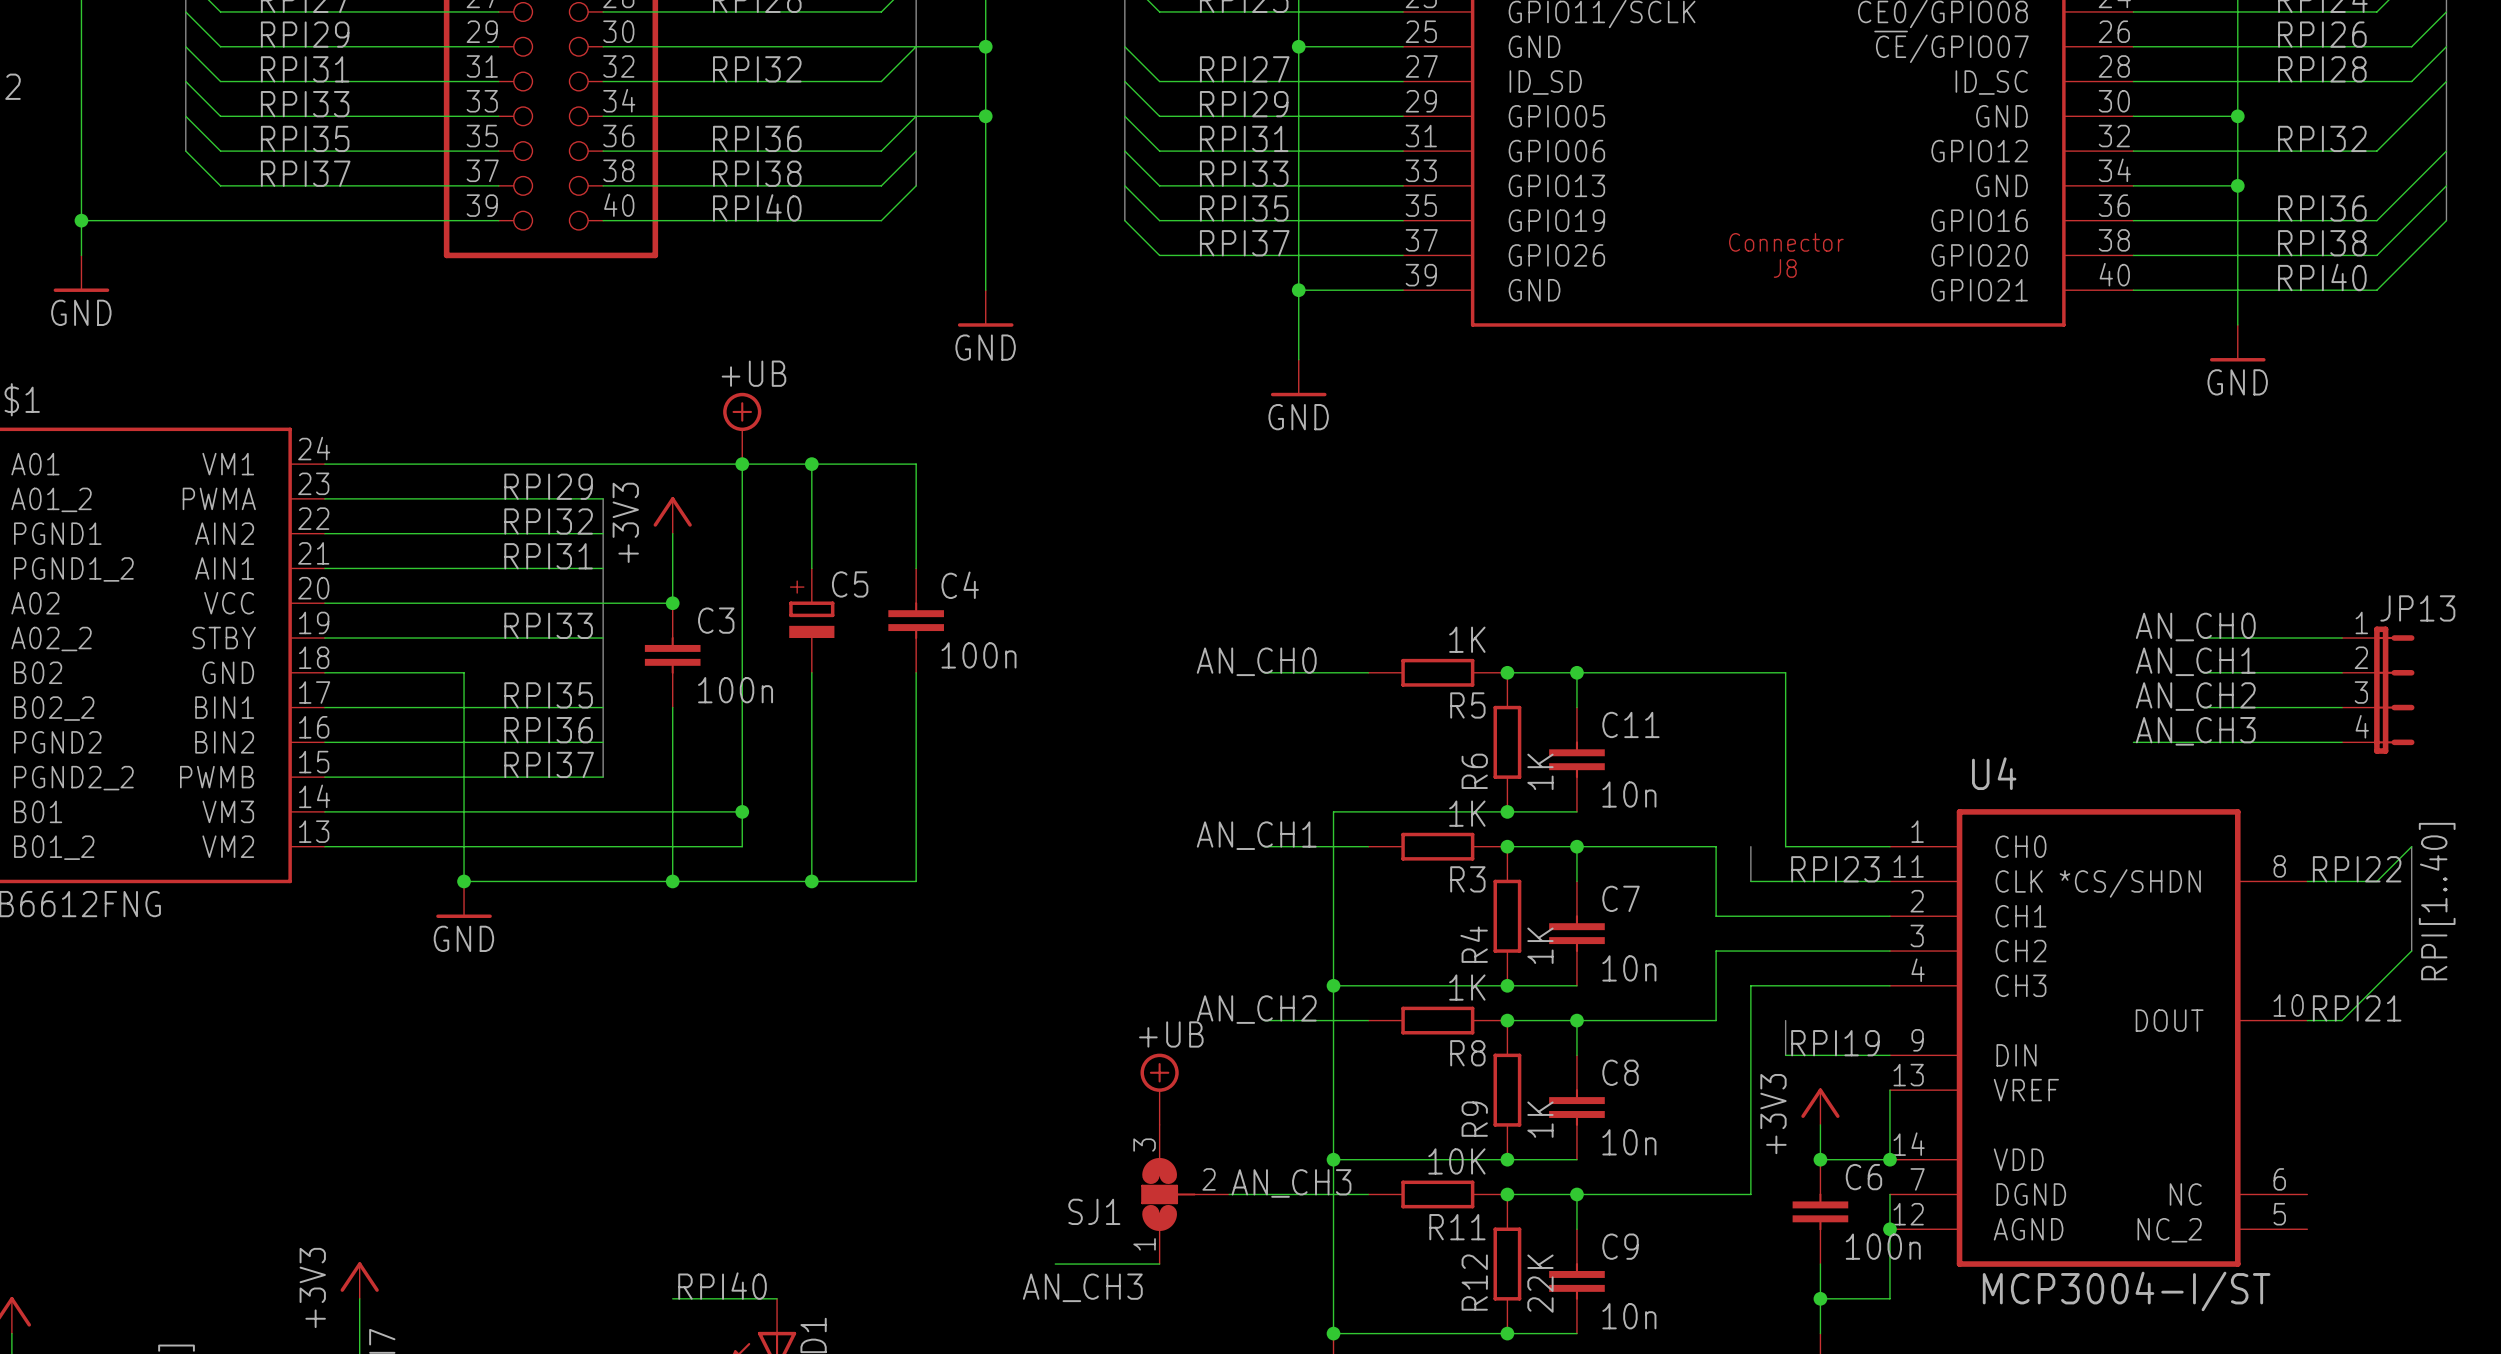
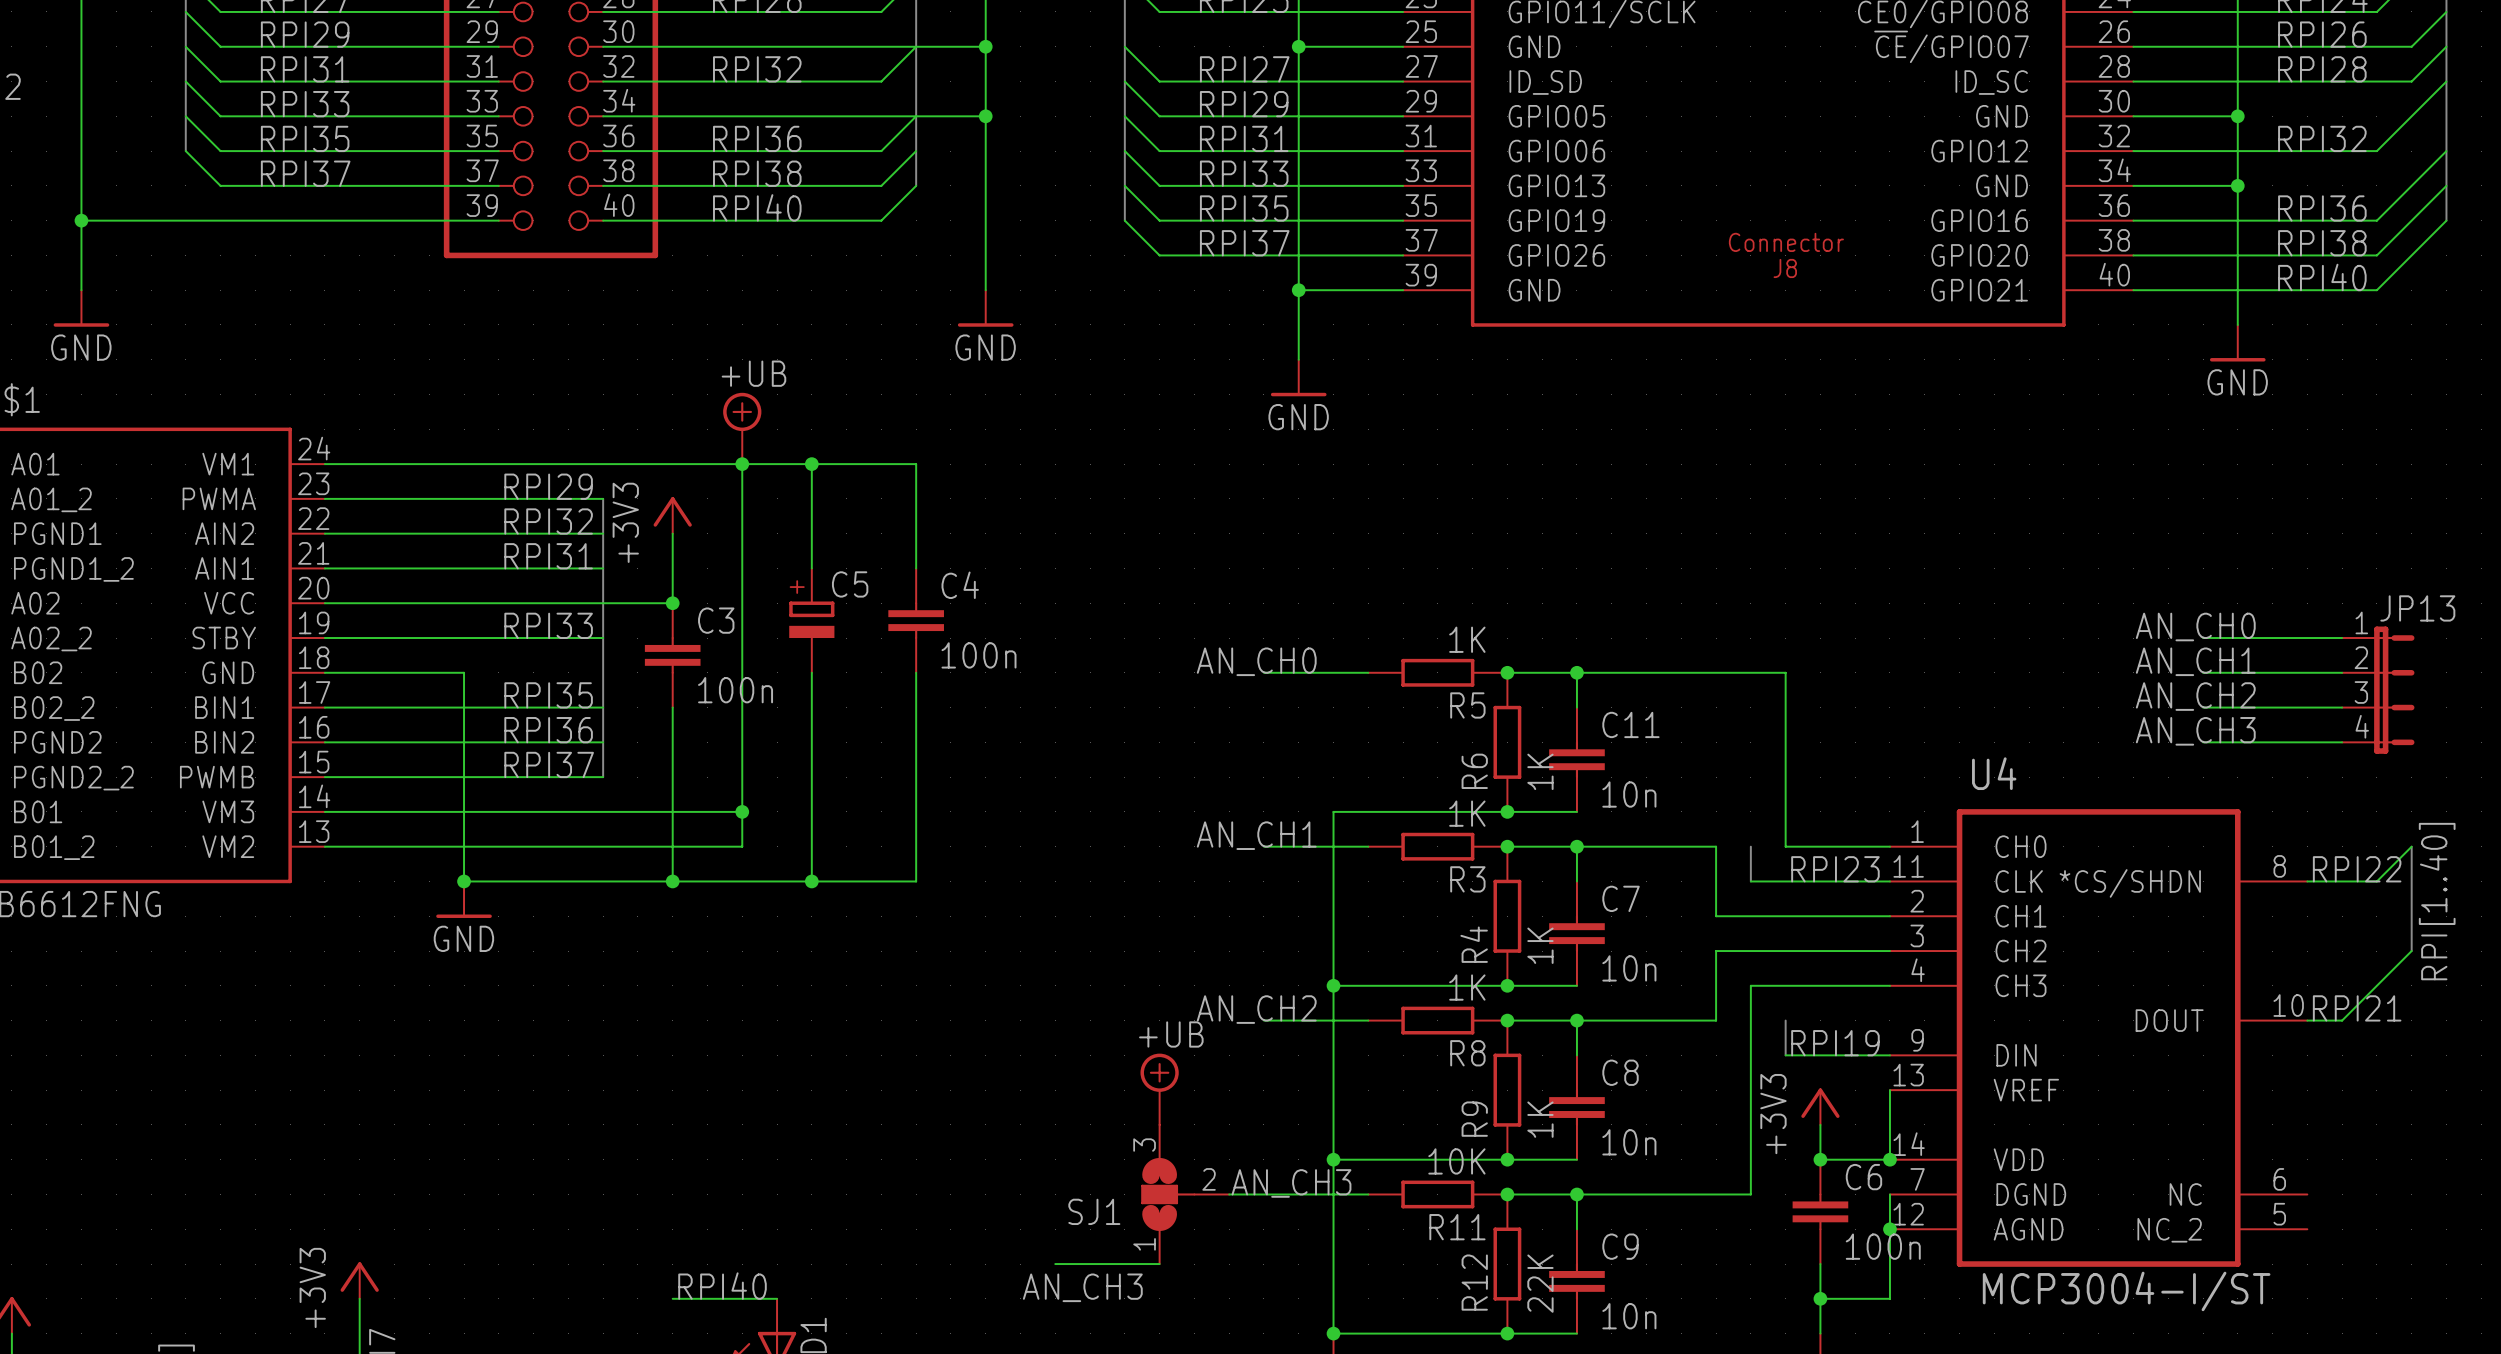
power symbol position: GND (81, 273) -> GND (81, 308)
wire: (2133, 742) (2203, 742) -> none

